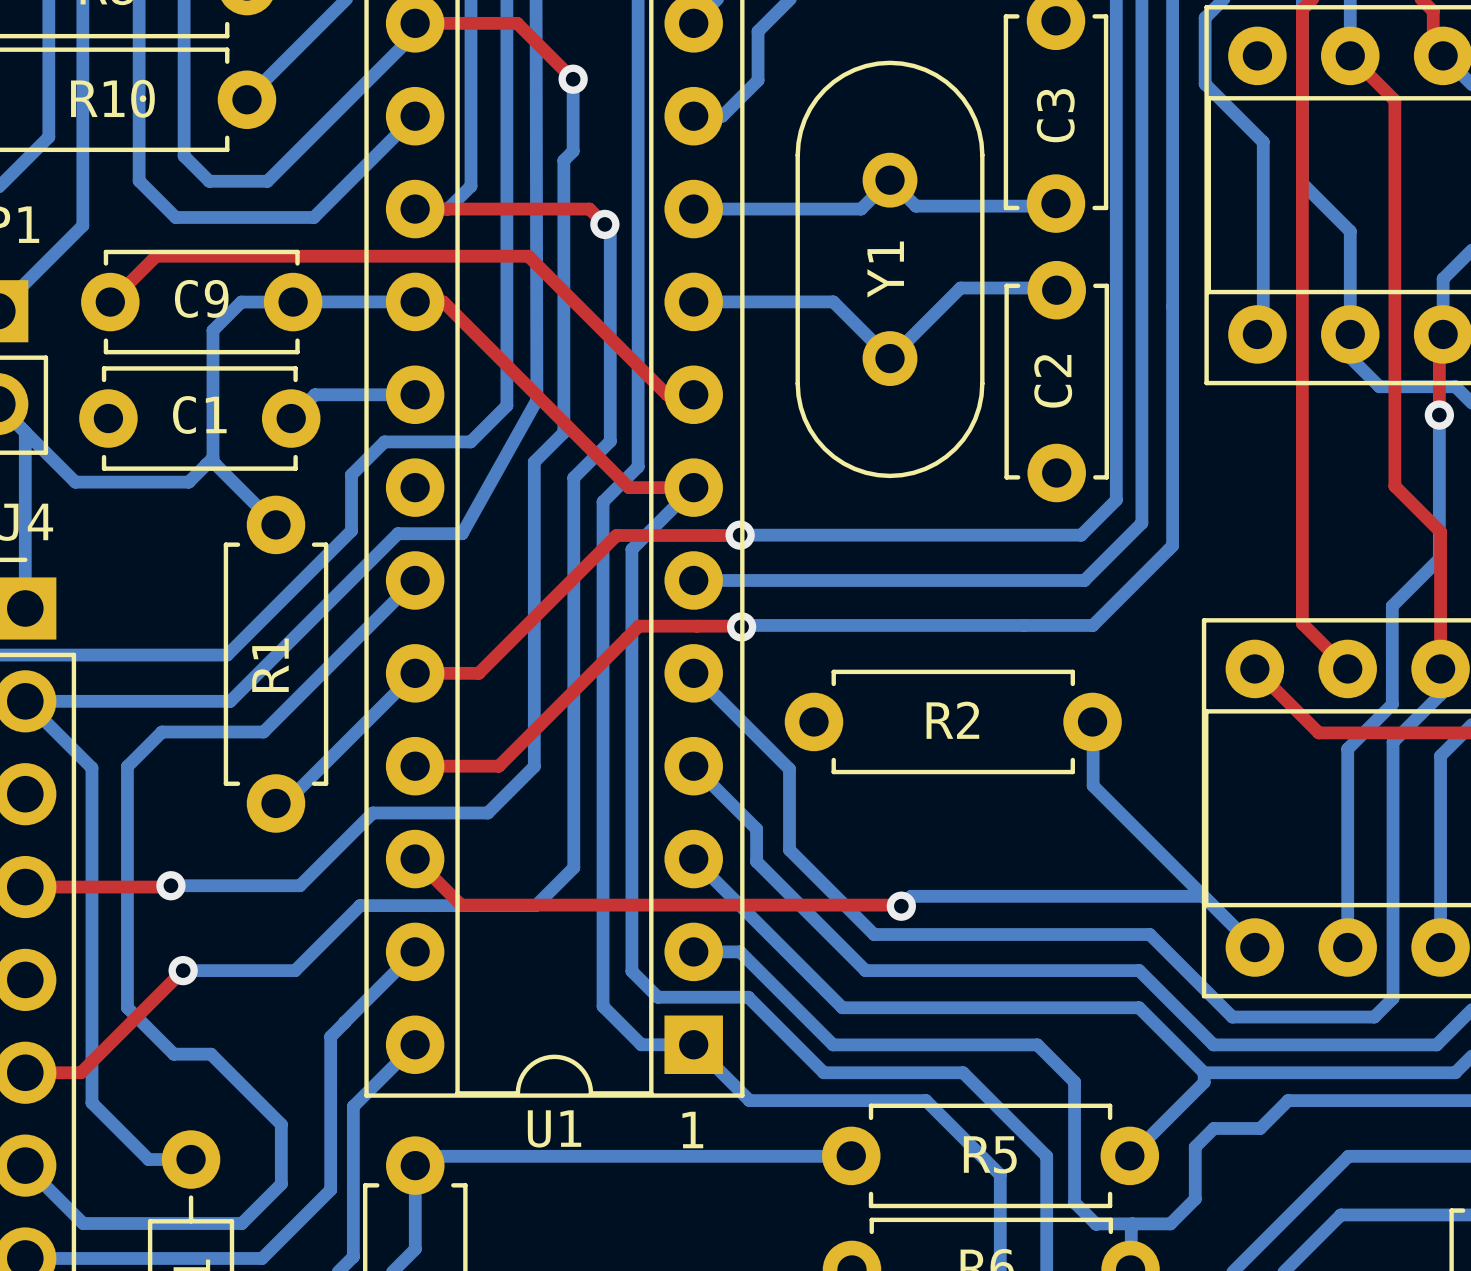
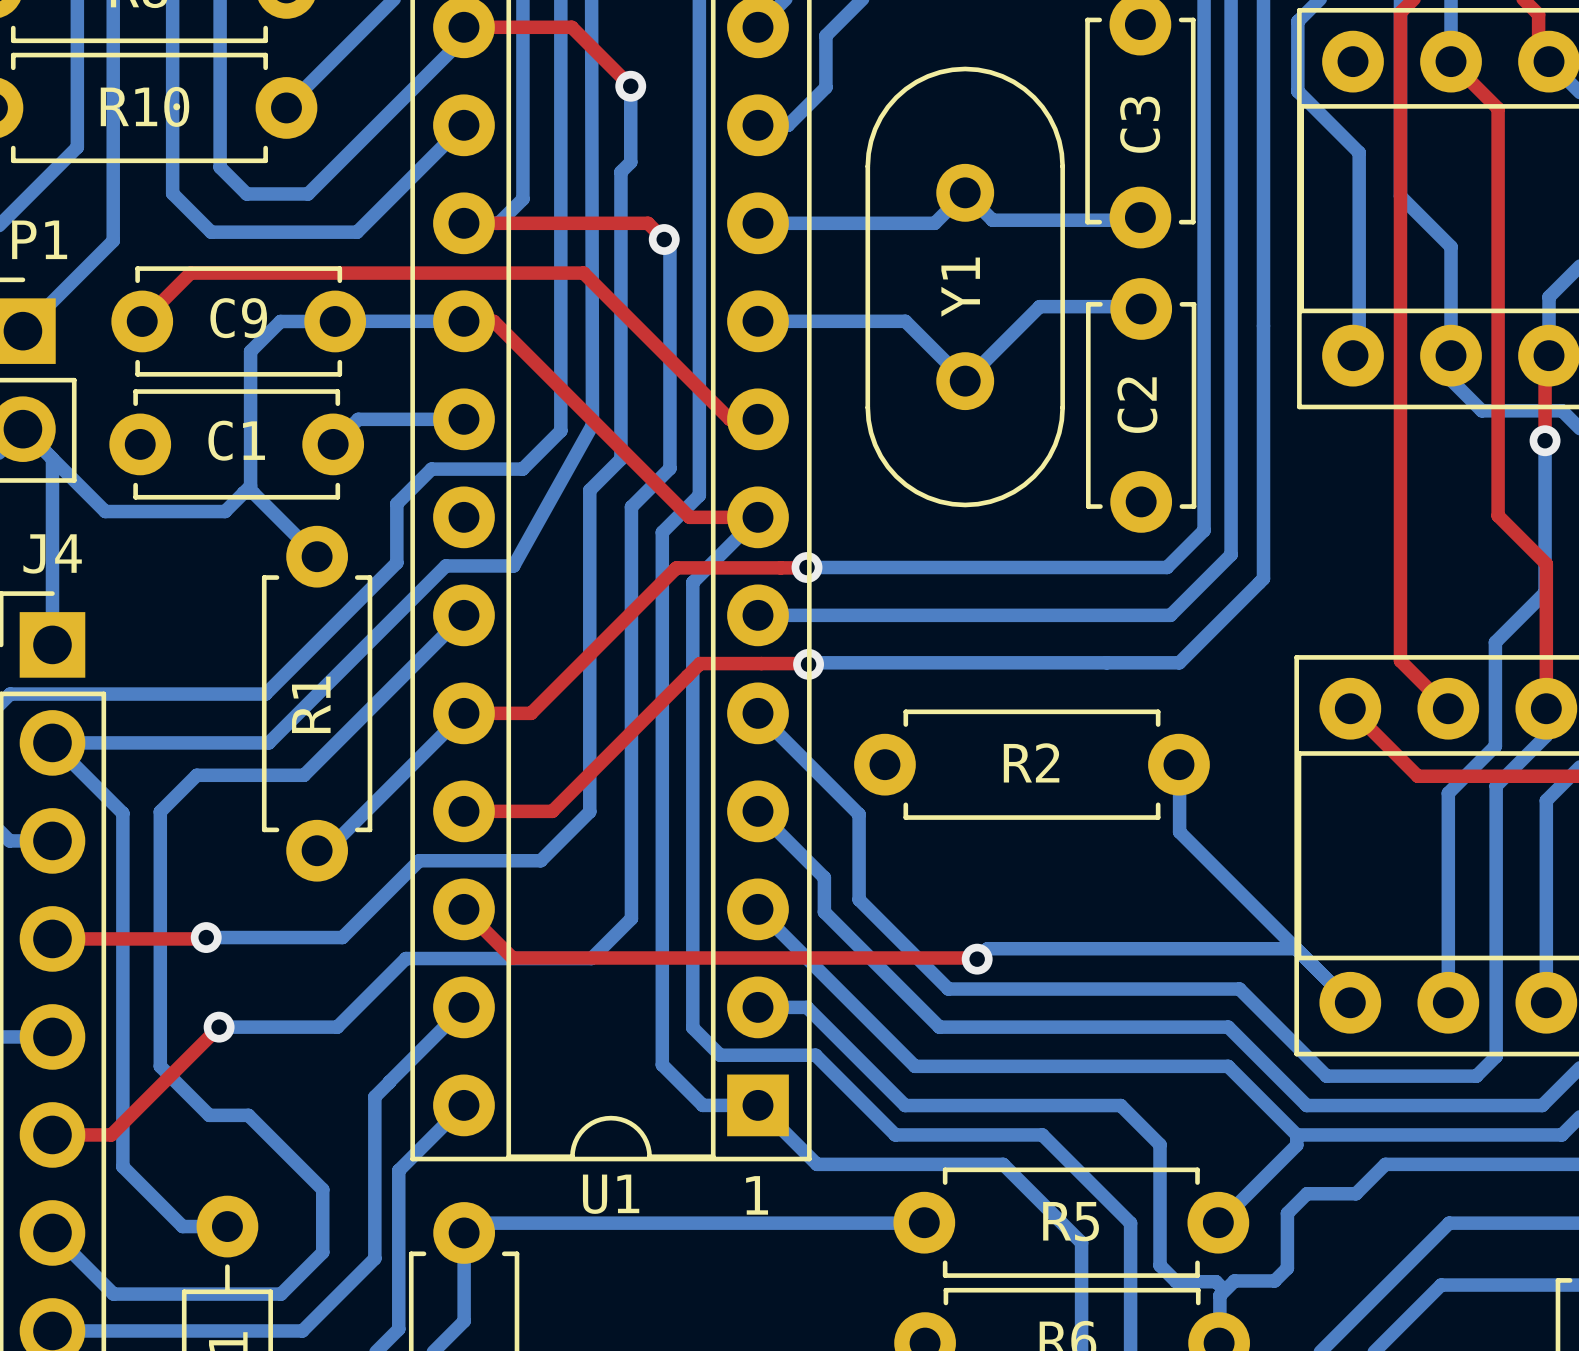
bottom track: (1074, 1196) (1074, 1202) (1096, 1224) -> (1160, 1265) (1176, 1281) (1216, 1281) (1223, 1289)
bottom track: (1183, 1211) (1170, 1223) (1096, 1223) -> (1274, 1280) (1234, 1280) (1221, 1294)

